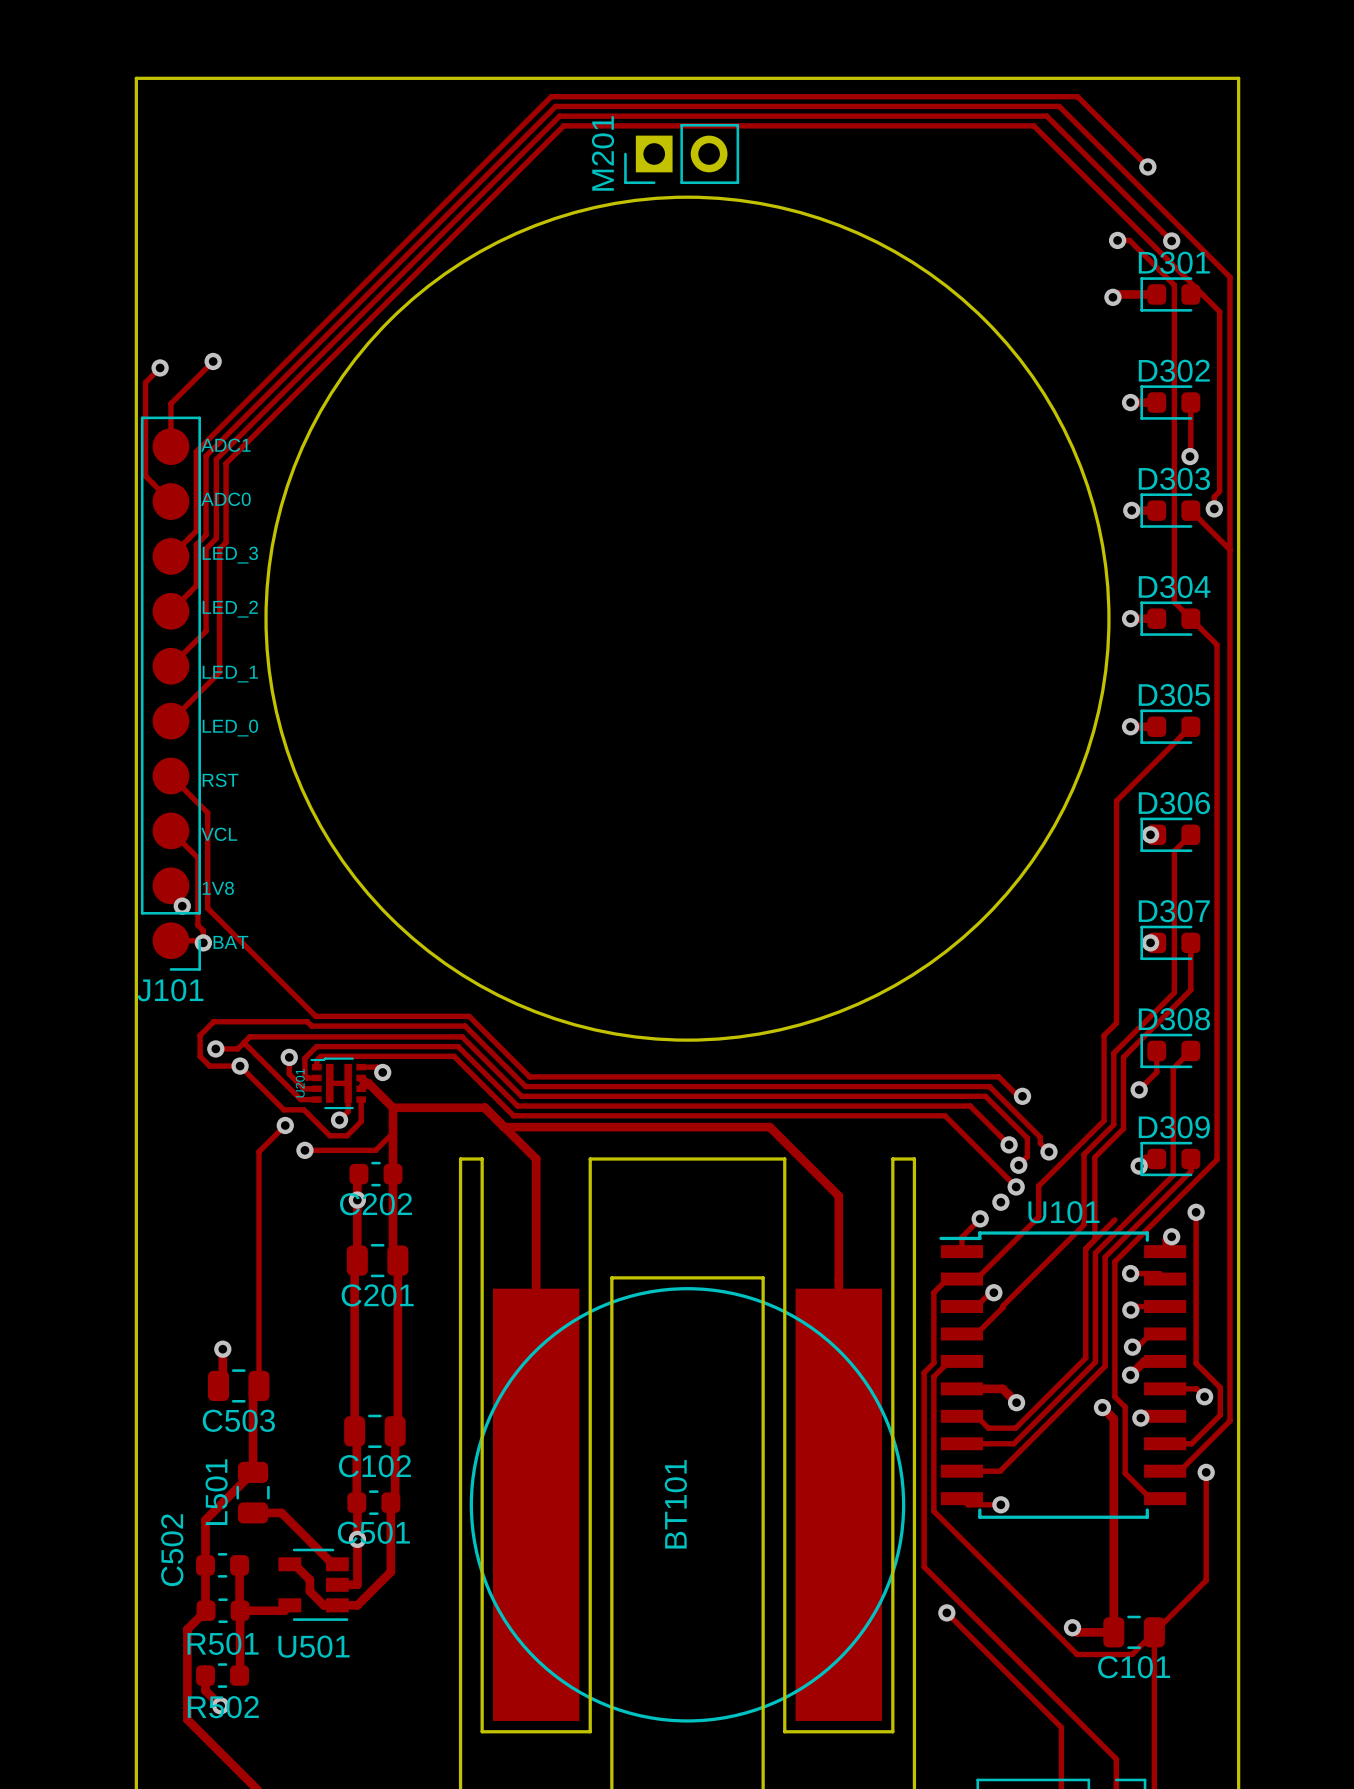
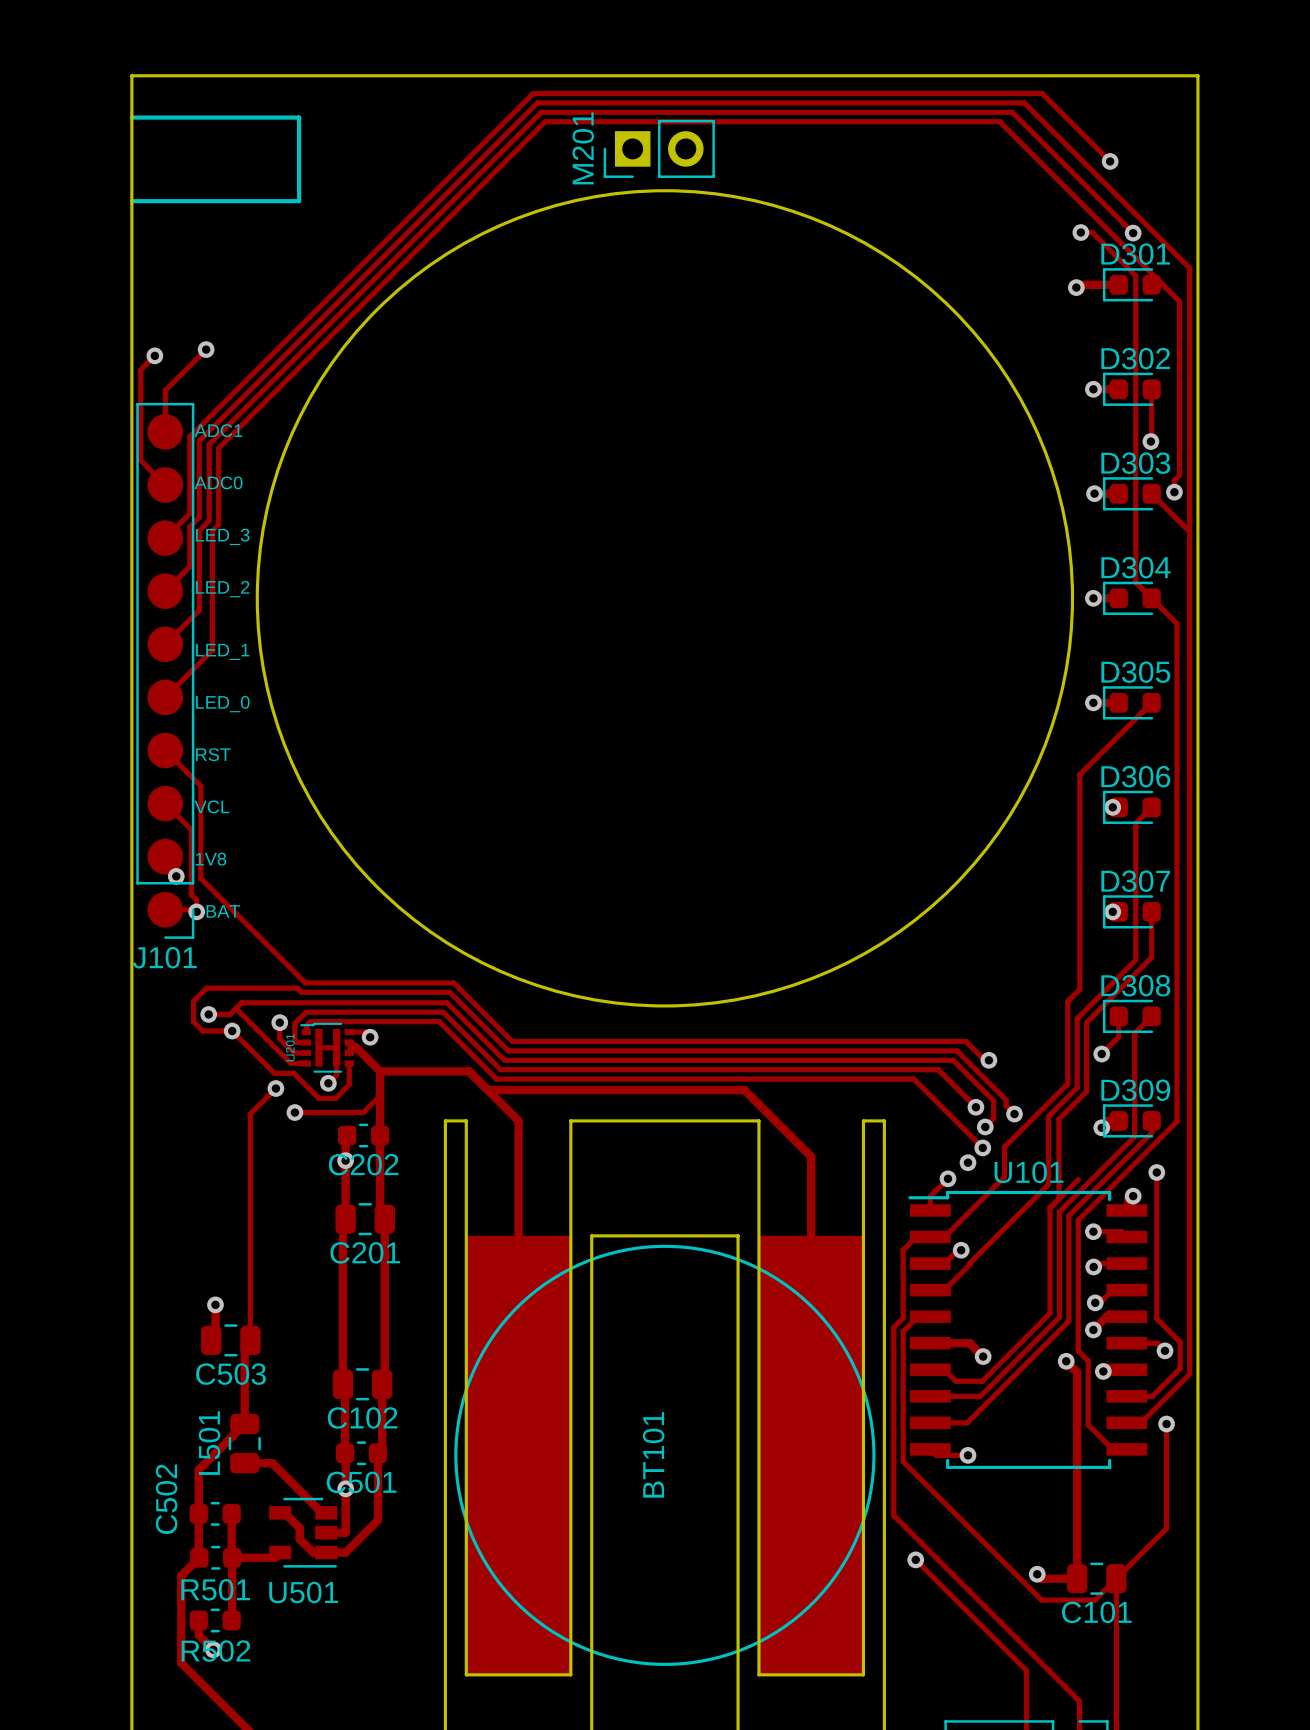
line: none -> (131, 117) (299, 117) (299, 201) (131, 201)
BT101 footprint: [469, 1287, 906, 1723] -> [454, 1235, 876, 1675]

